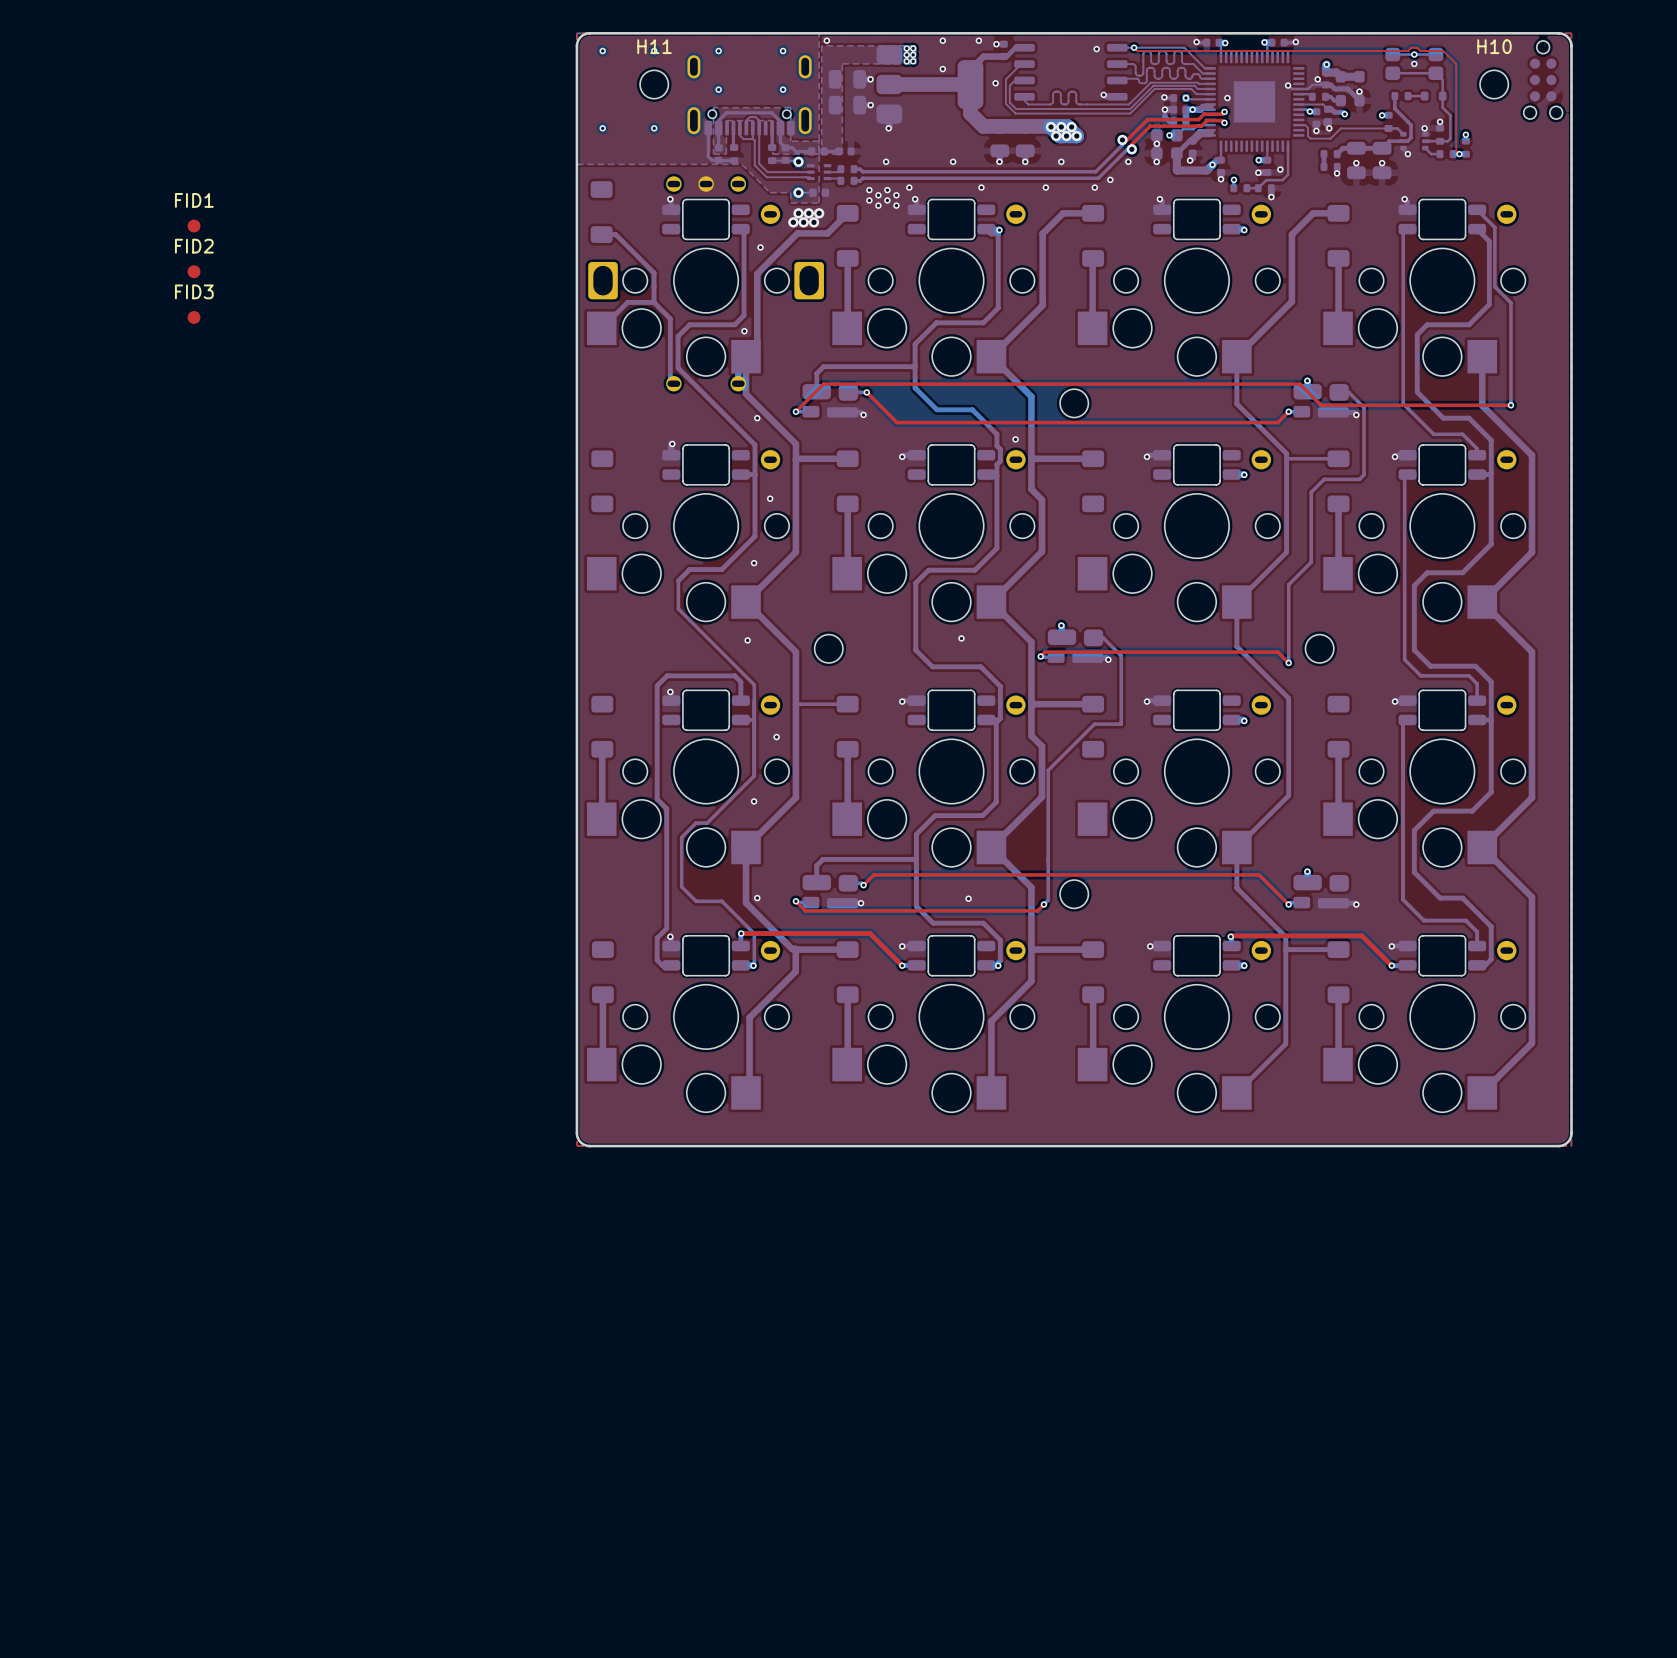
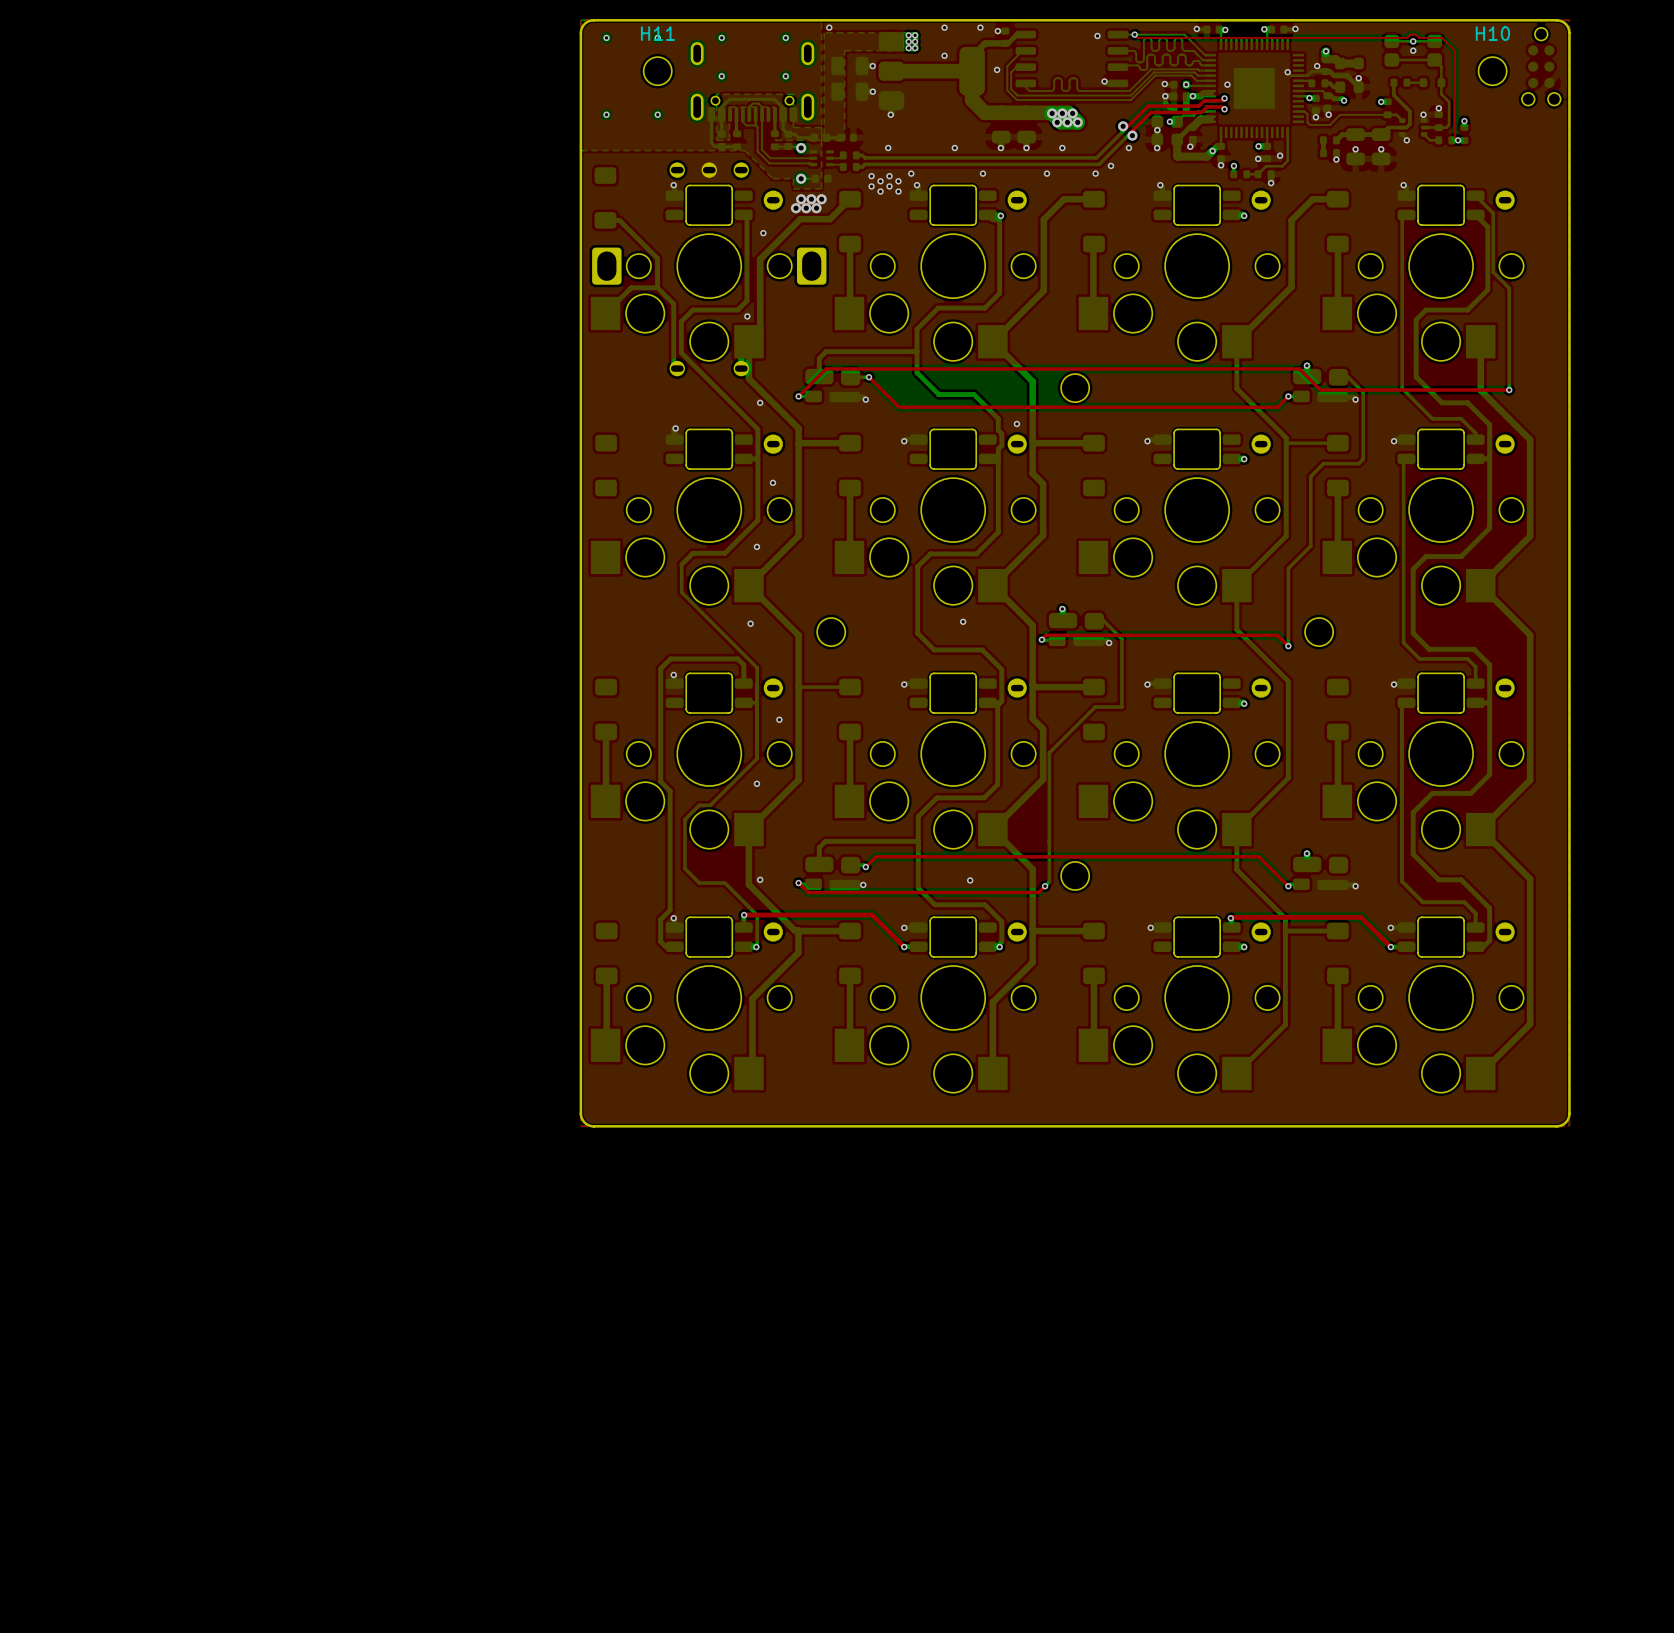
FID1: (194, 226) -> none
FID2: (194, 271) -> none
FID3: (194, 317) -> none

